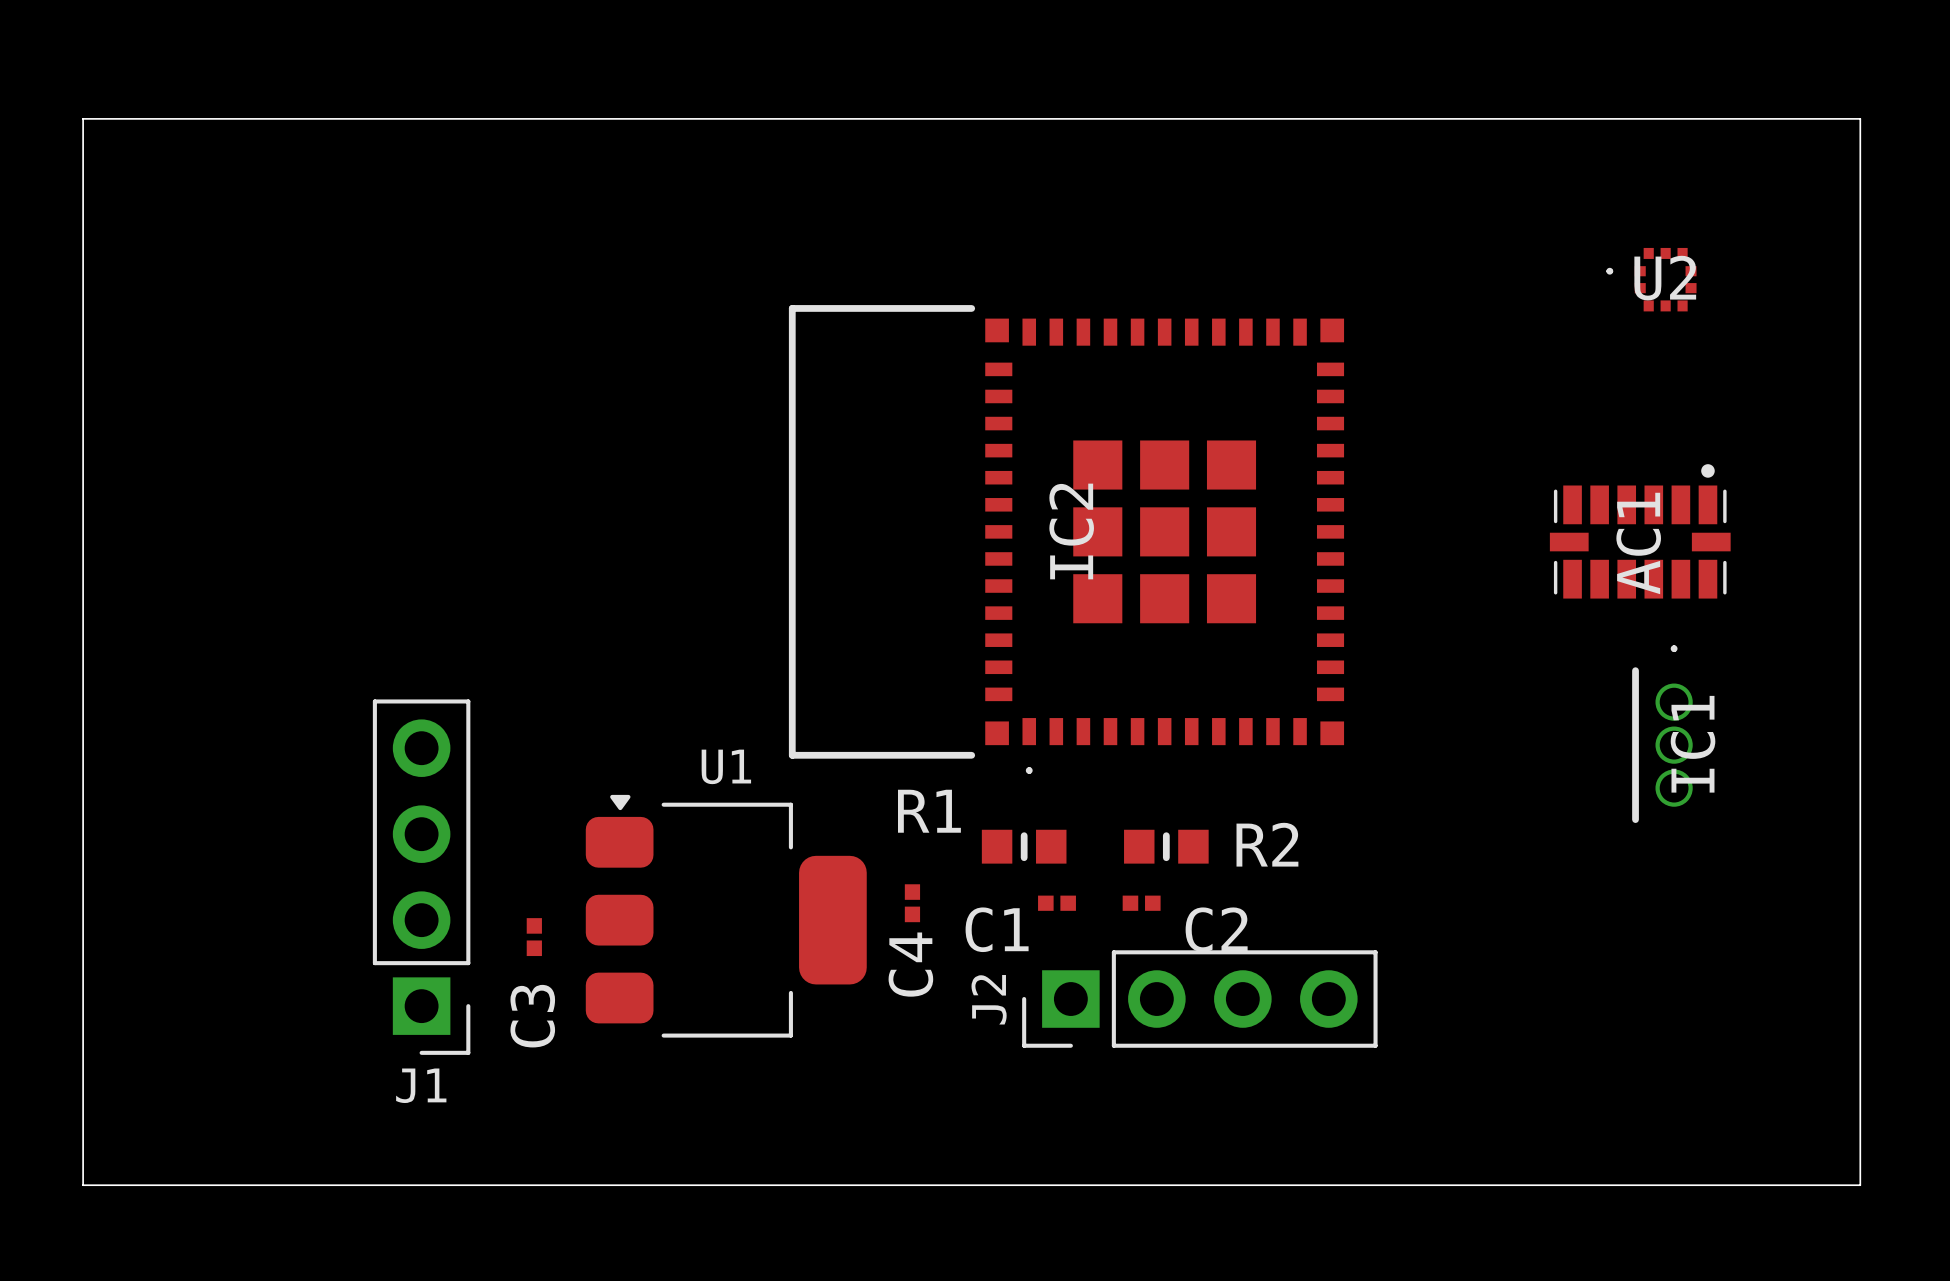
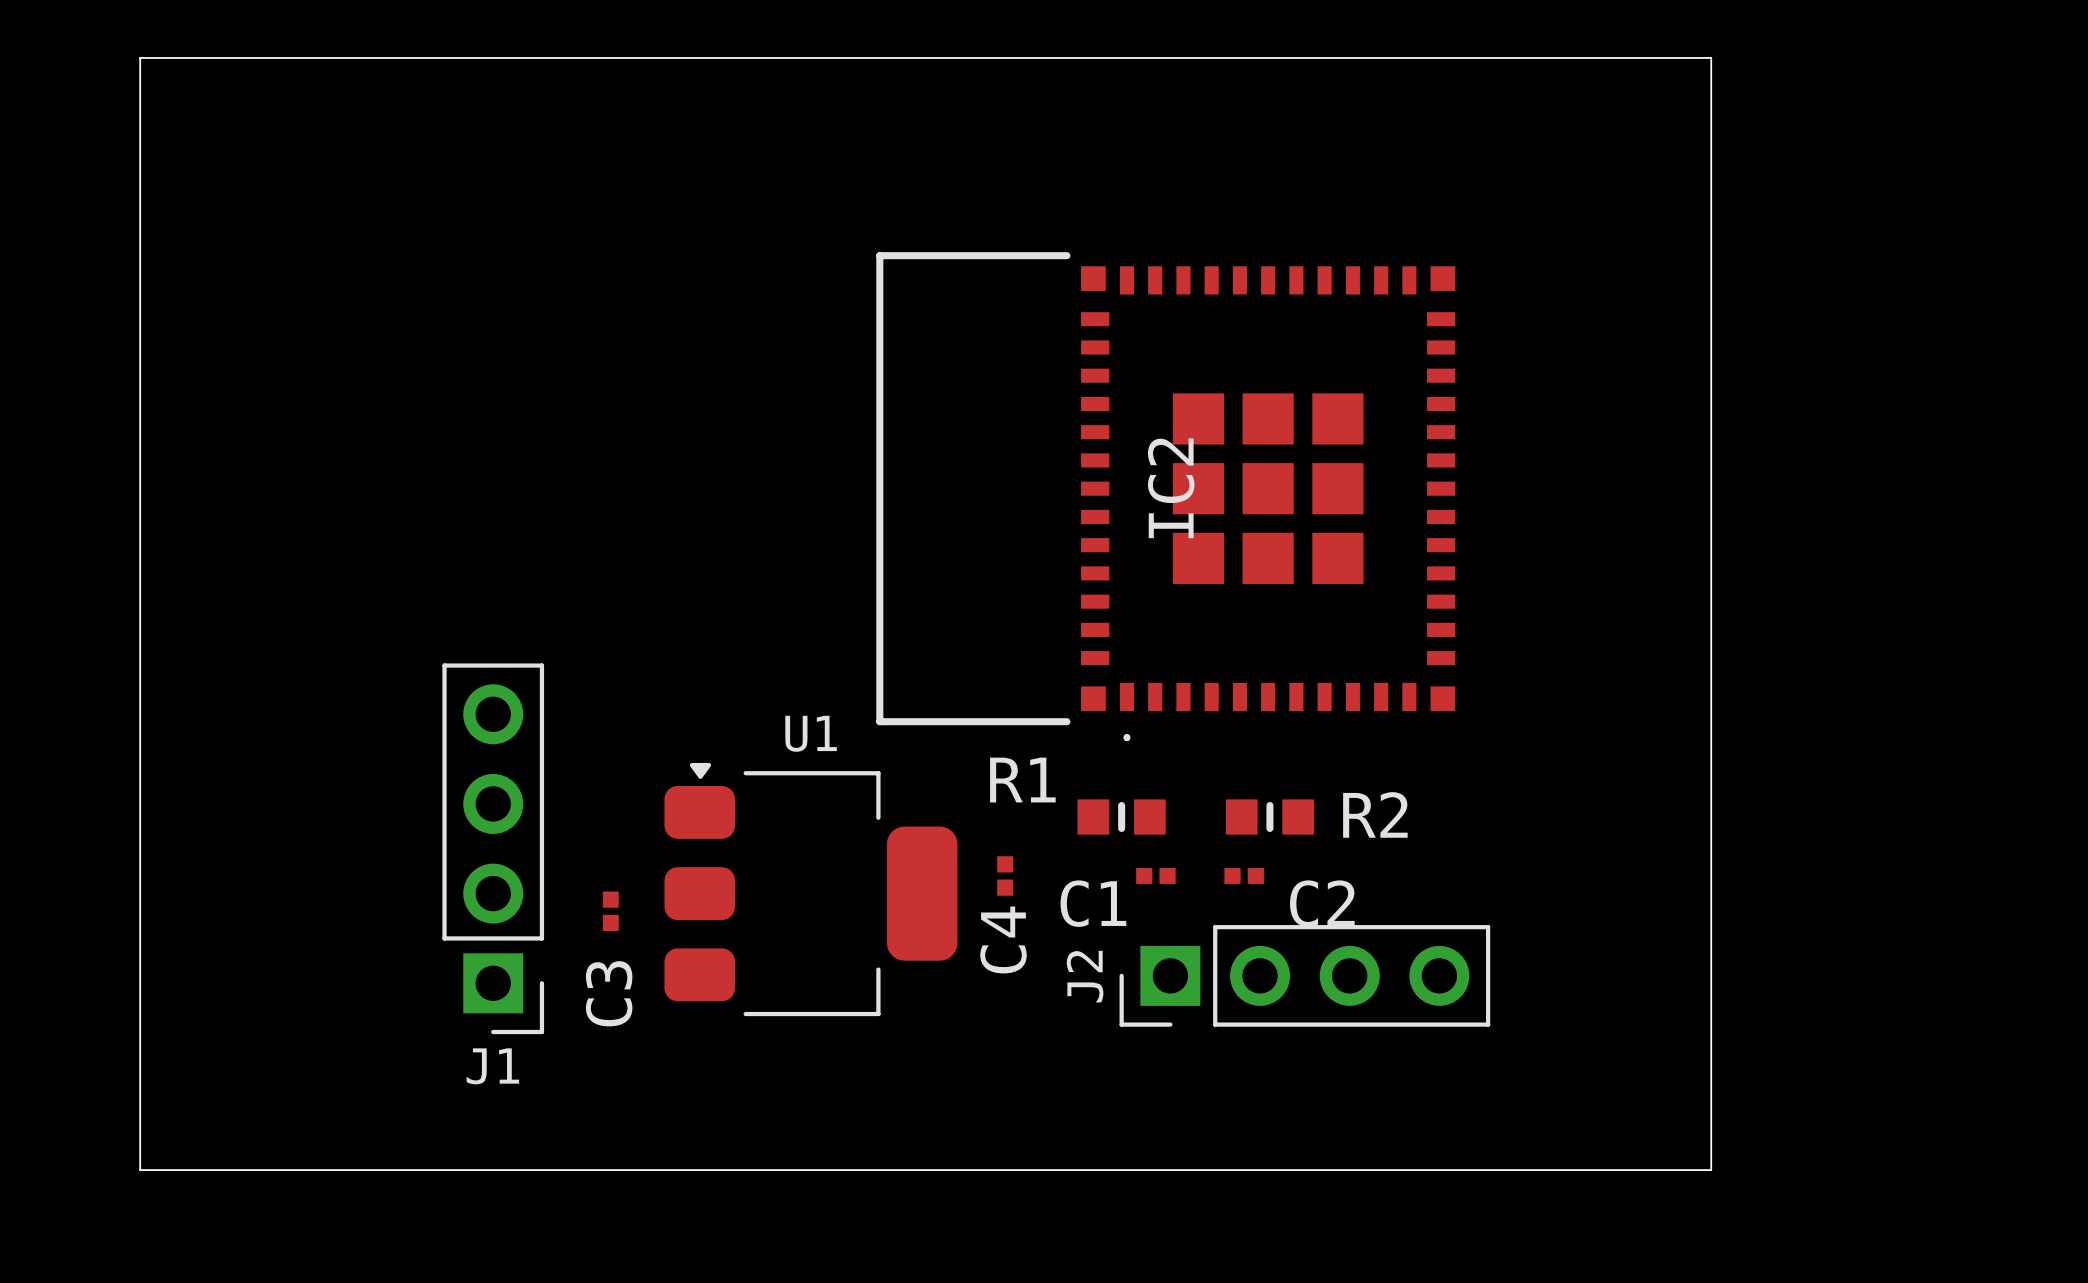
board edge: (1589, 118) (1860, 118) (1860, 1185) (1589, 1185) -> (1711, 57) (1711, 1170)
U2: (1651, 279) -> none
AC1: (1640, 531) -> none
IC1: (1662, 734) -> none

